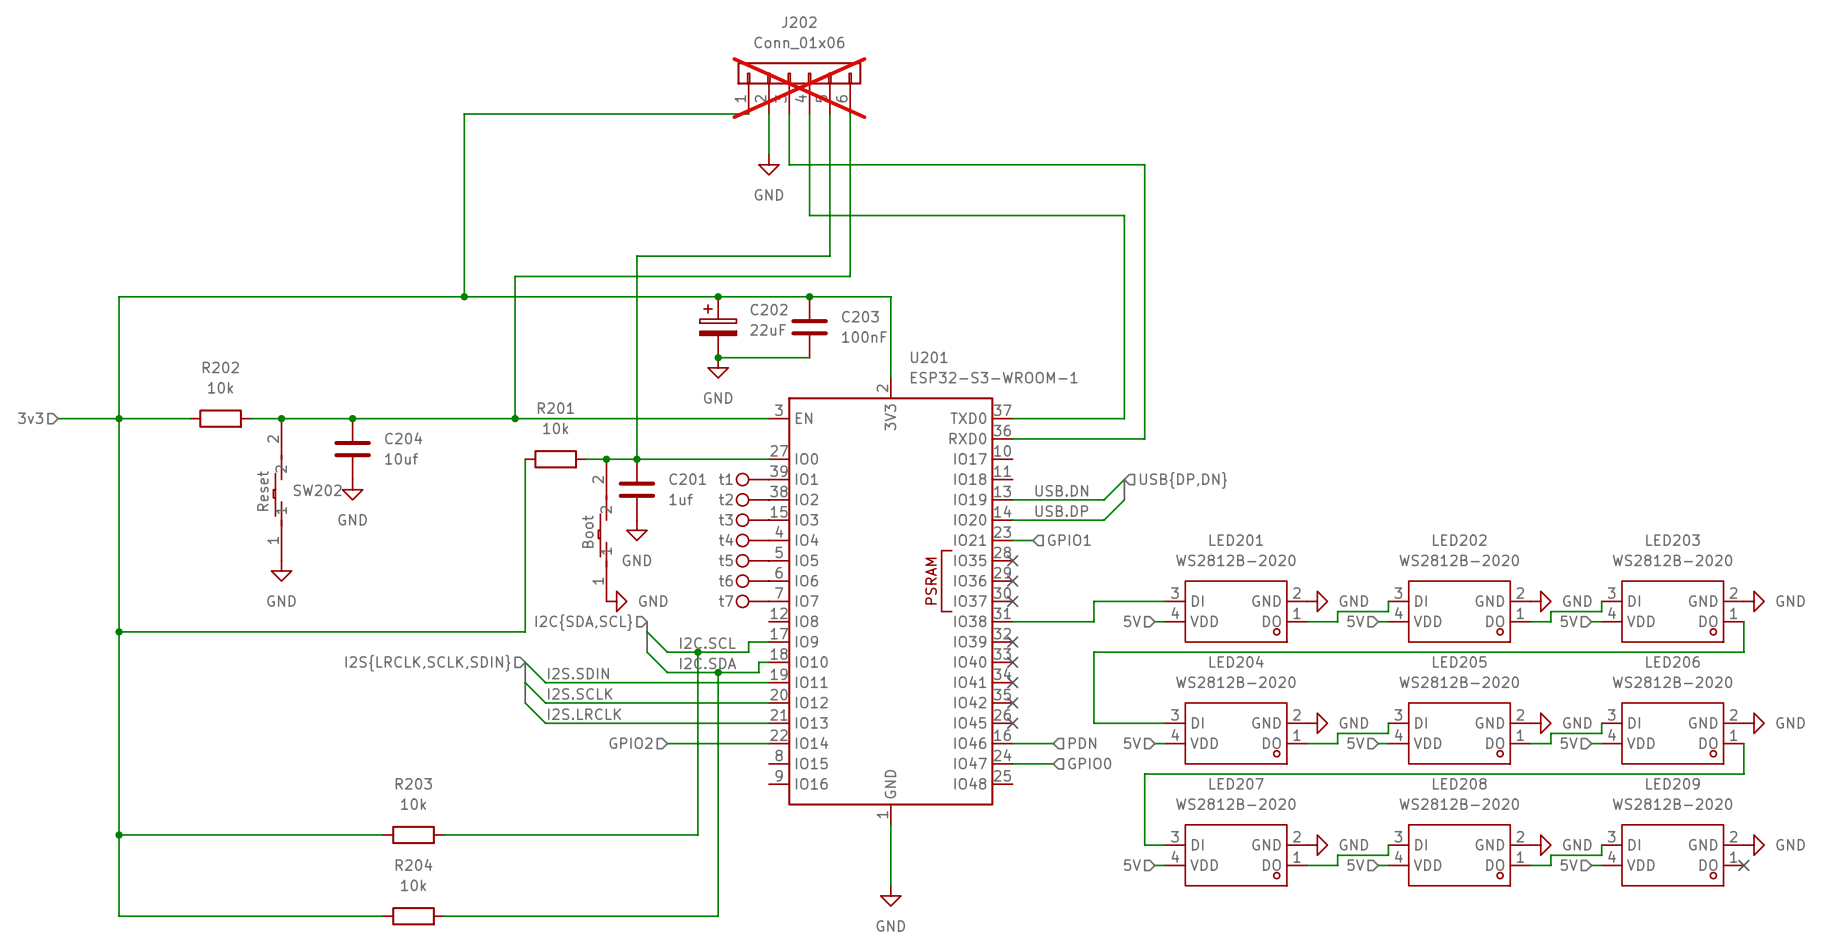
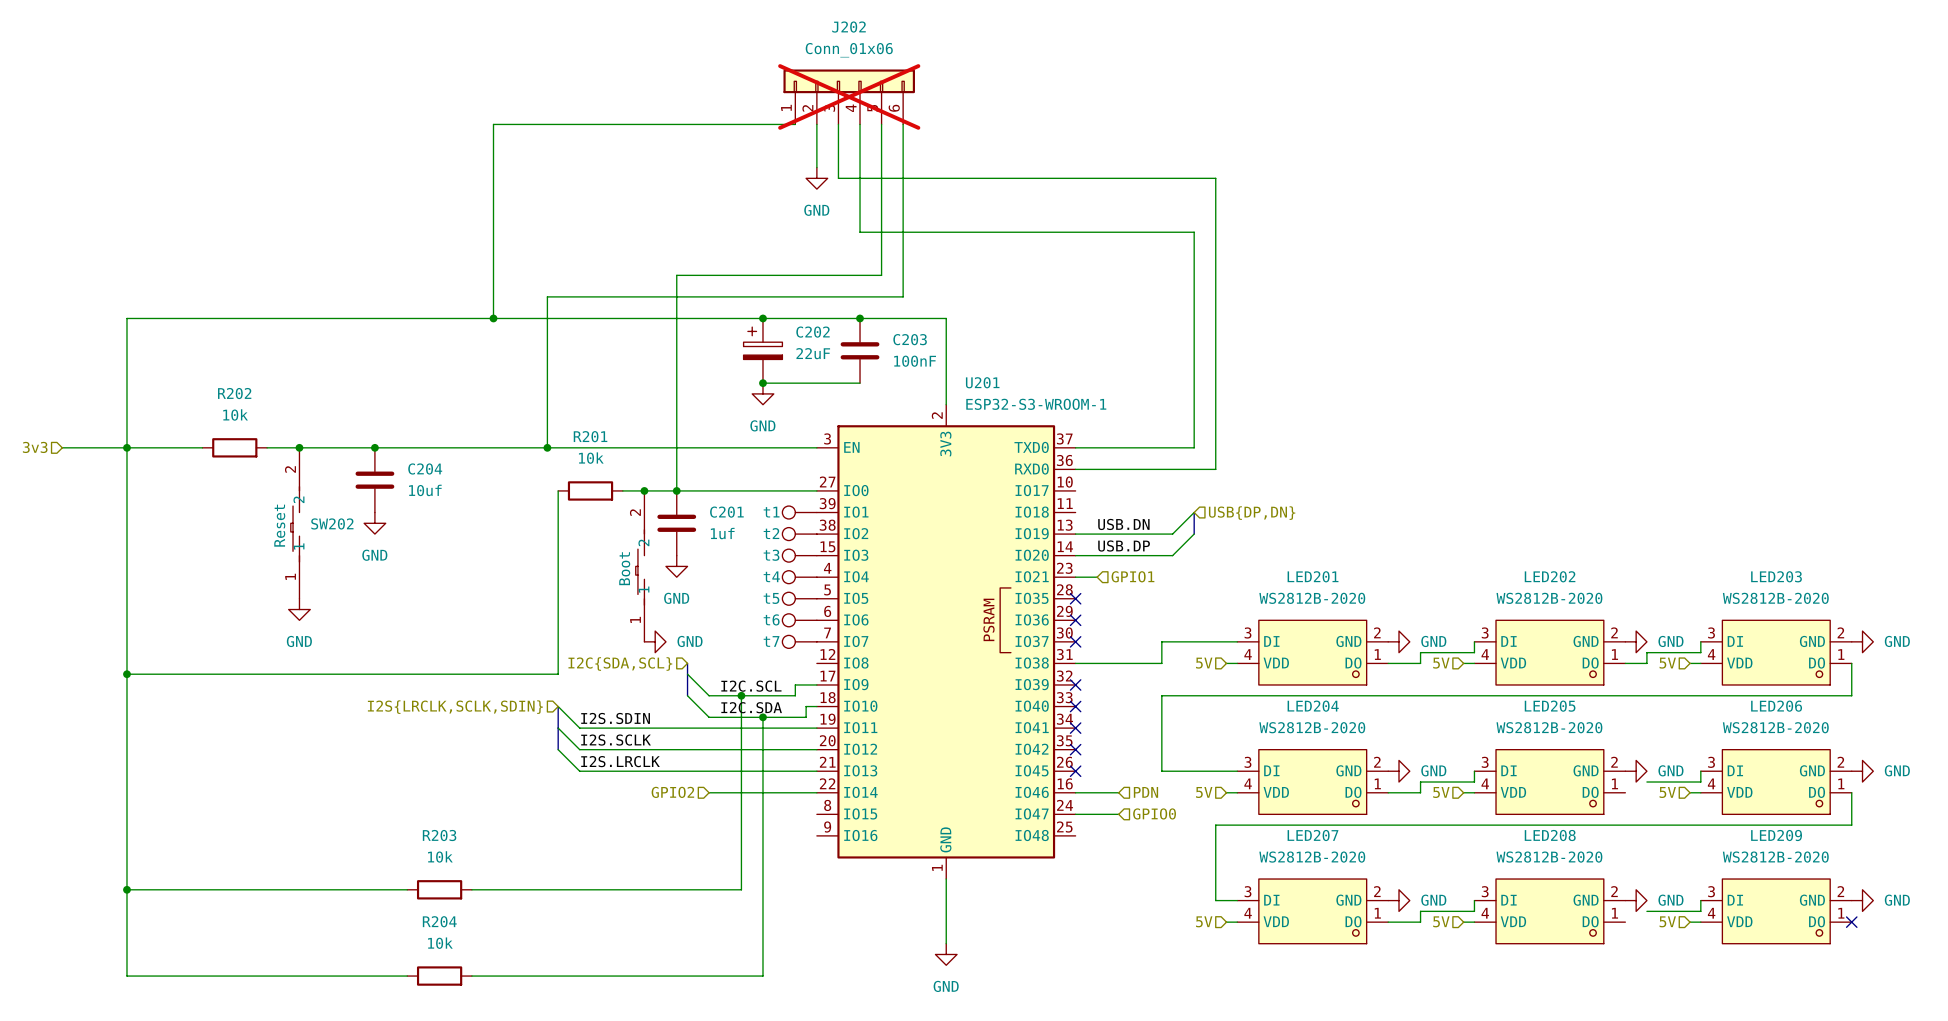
wire: (1550, 733) (1550, 743) (1530, 743) -> none
wire: (1550, 855) (1550, 865) (1530, 865) -> none

